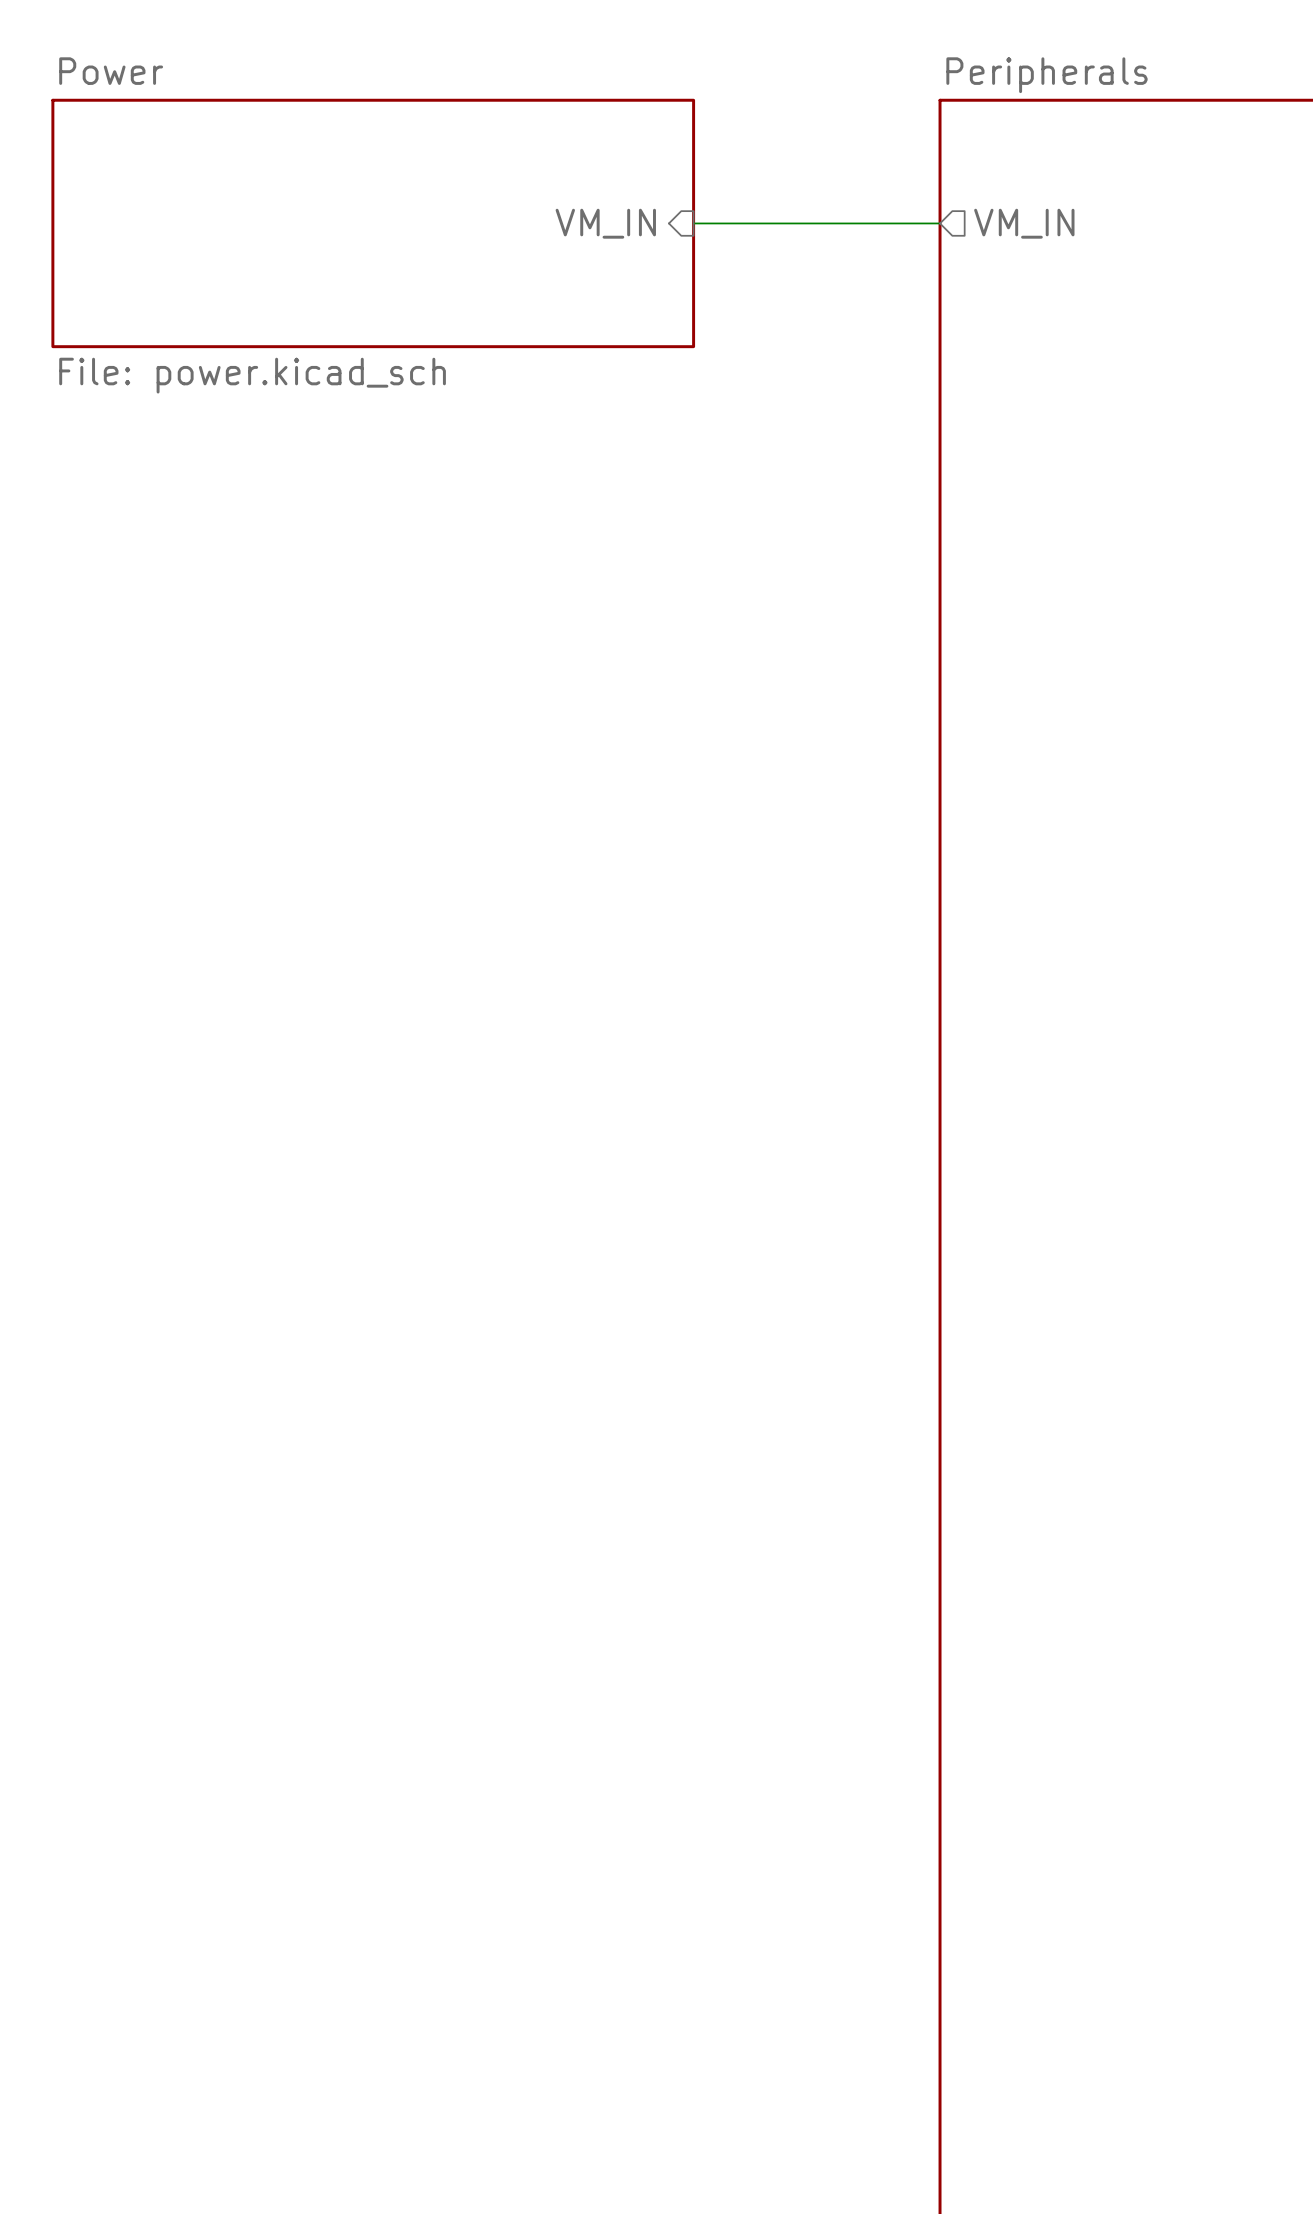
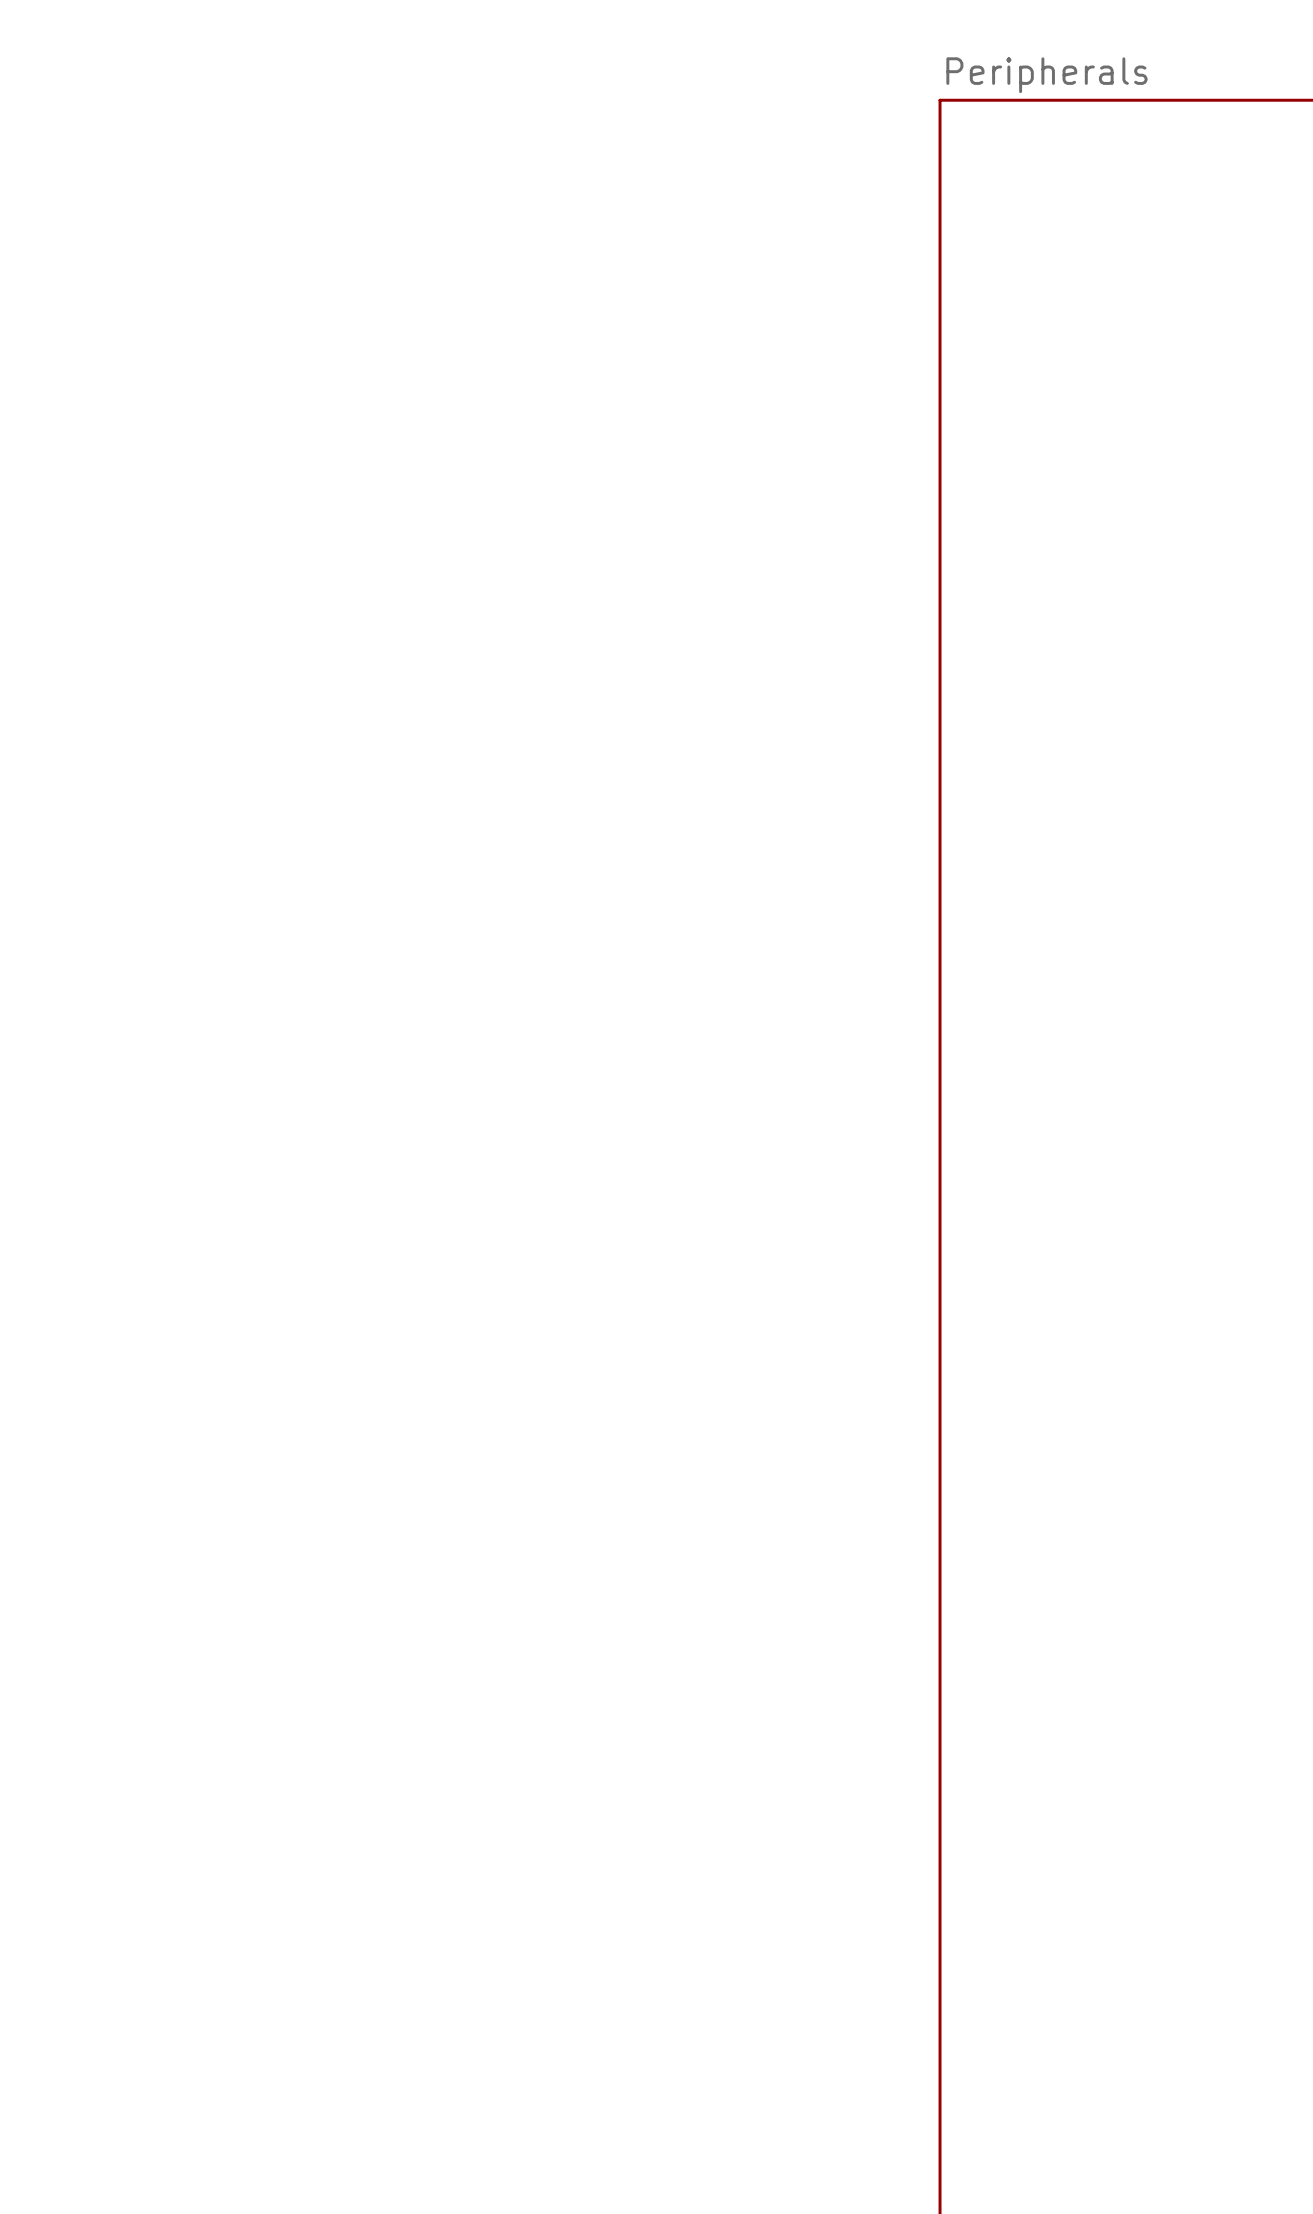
sheet Power: File: power.kicad_sch (373, 223) -> none
sheet pin: VM_IN (605, 223) -> none
wire: (693, 223) (940, 223) -> none
sheet pin: VM_IN (1024, 223) -> none

